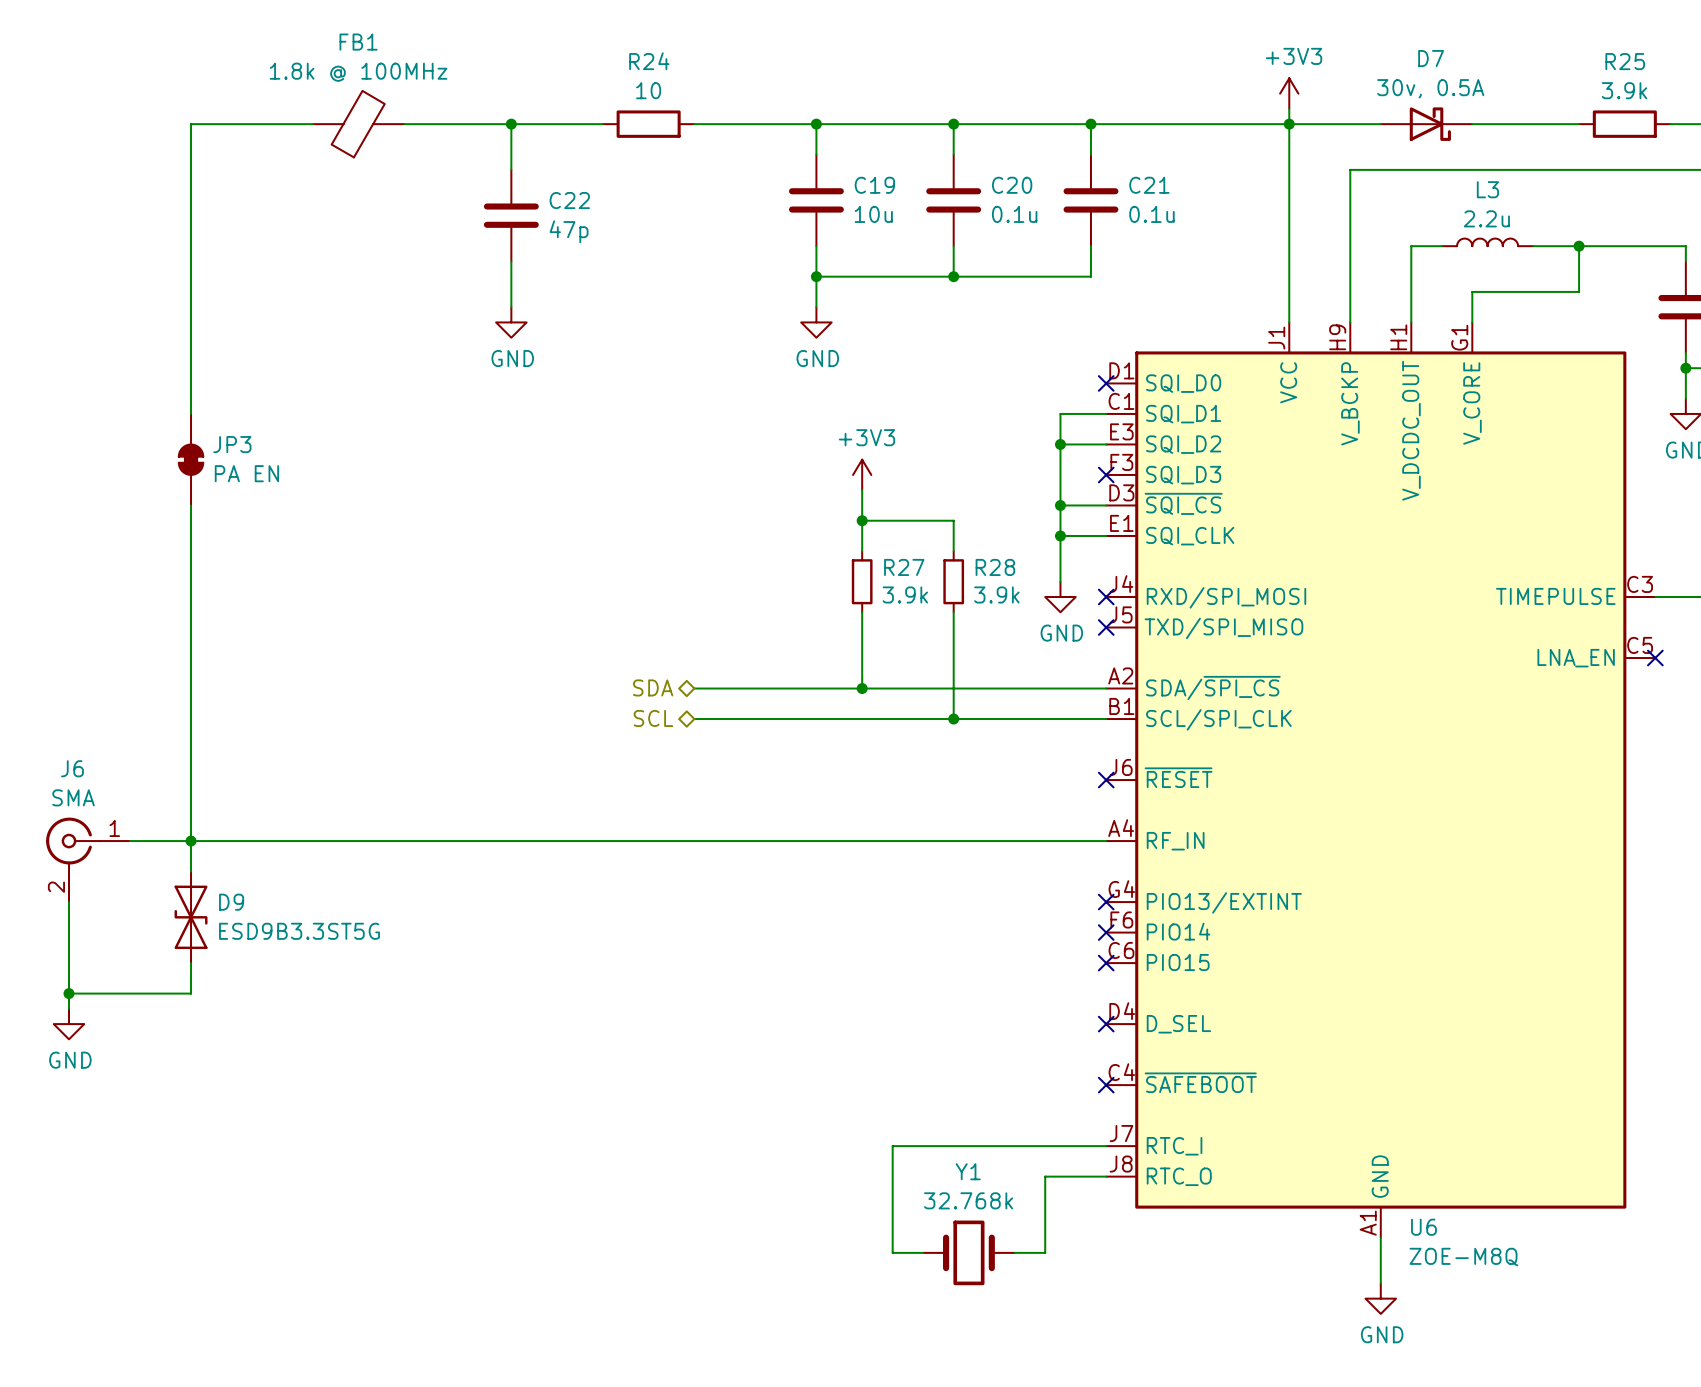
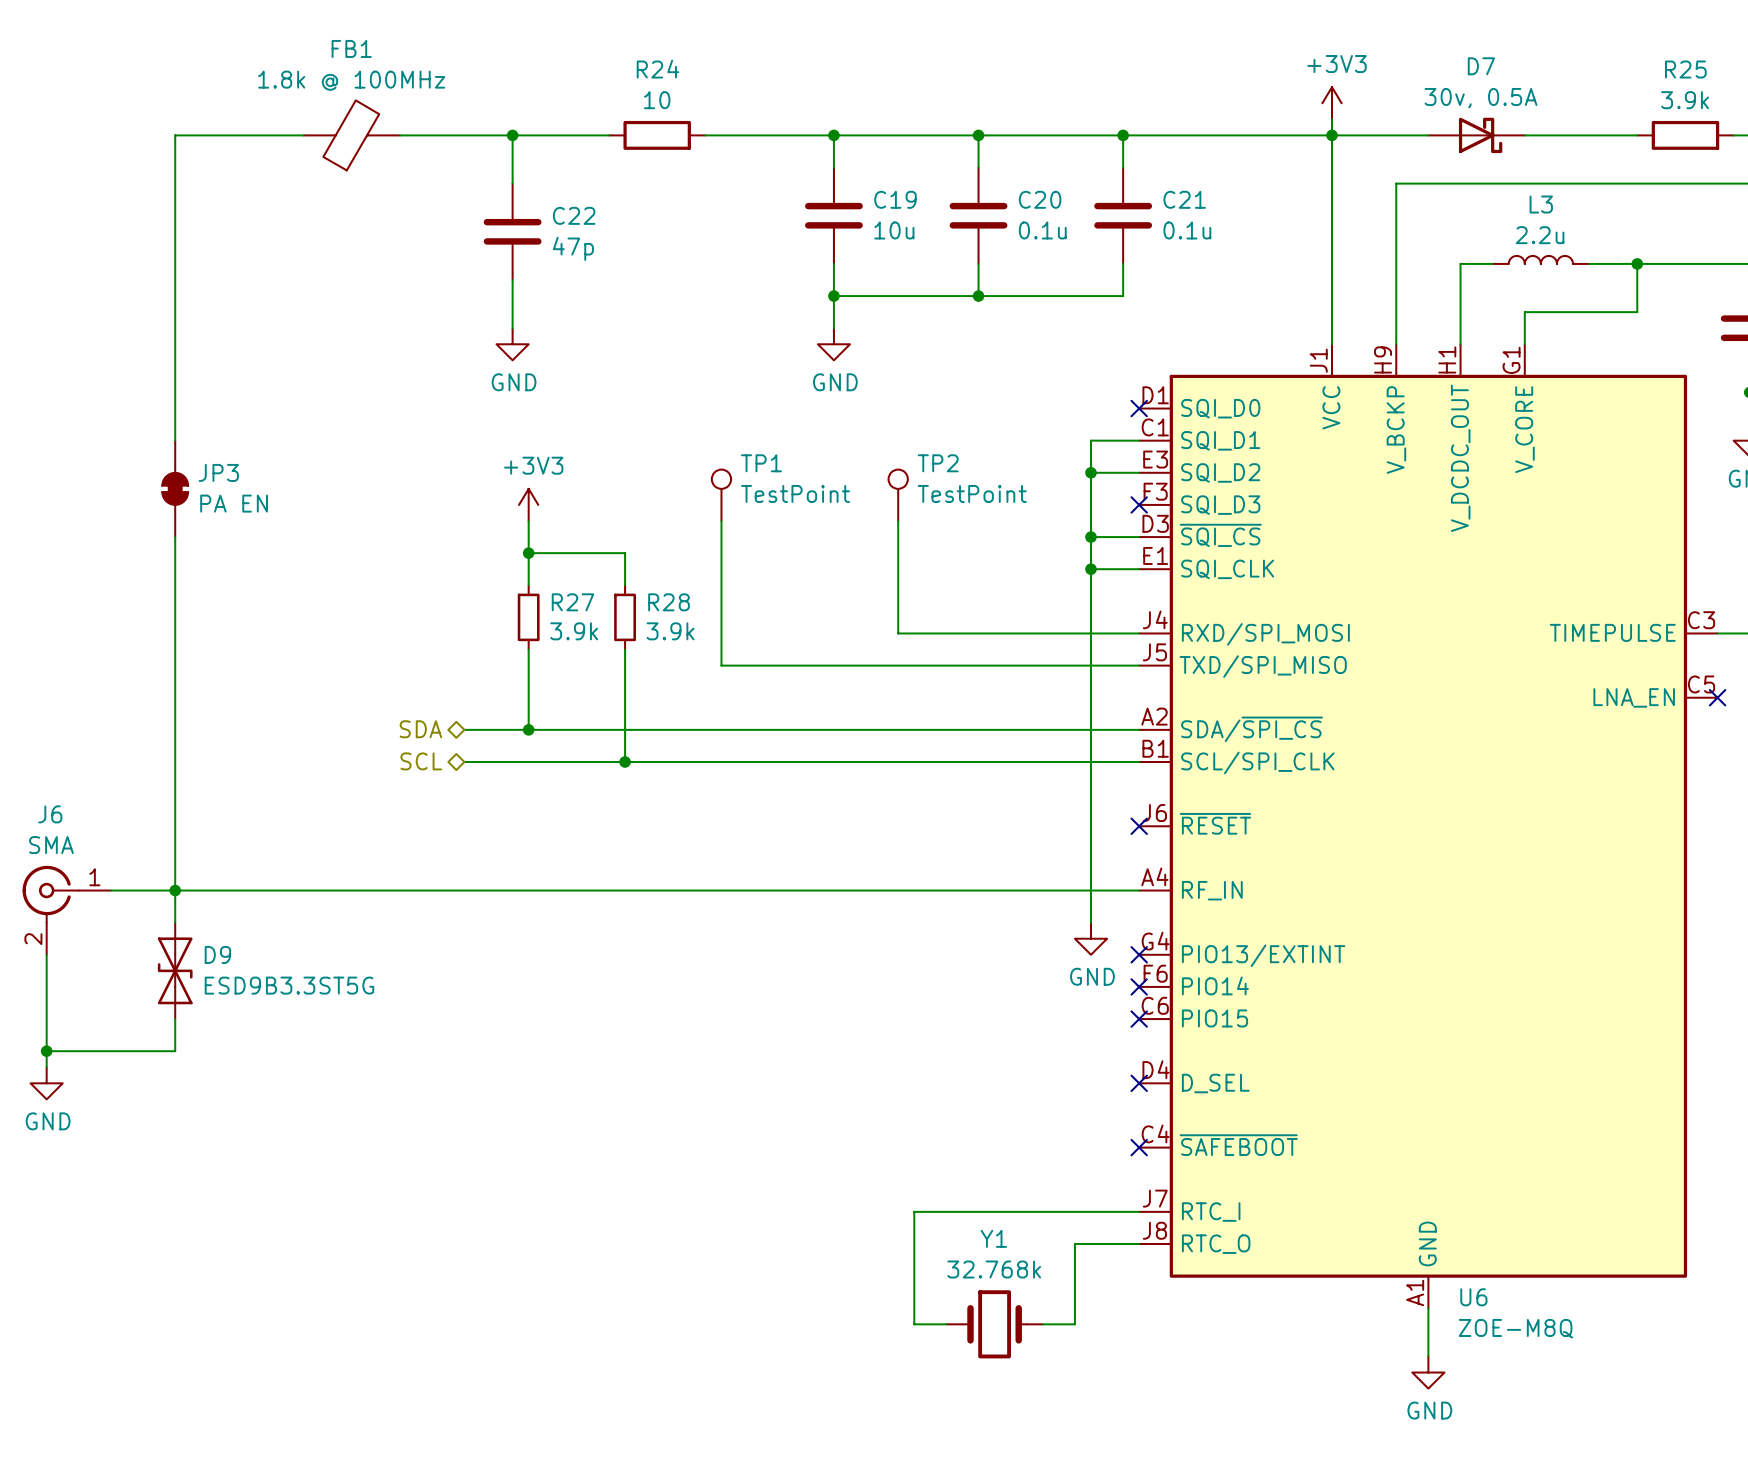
TP1: none -> TestPoint (721, 495)
TP2: none -> TestPoint (898, 495)
power symbol: none -> +3V3 (528, 504)
power symbol: +3V3 (862, 474) -> none
wire: none -> (528, 521) (528, 585)
wire: none -> (721, 521) (721, 665) (1139, 665)
wire: (862, 490) (862, 551) -> none
wire: none -> (898, 521) (898, 633) (1139, 633)
wire: none -> (528, 553) (625, 553) (625, 585)
junction: none -> (528, 553)
wire: (862, 520) (953, 520) (953, 551) -> none
junction: (862, 520) -> none
R27 position: (862, 581) -> (528, 617)
R28 position: (953, 581) -> (625, 617)
wire: none -> (1091, 617) (1091, 922)
power symbol position: GND (1060, 596) -> GND (1091, 938)
no-connect mark: (1106, 596) -> none
wire: none -> (528, 649) (528, 729)
wire: none -> (625, 649) (625, 762)
wire: (862, 612) (862, 688) -> none
wire: (953, 612) (953, 719) -> none
no-connect mark: (1106, 627) -> none
hierarchical label position: SDA (653, 687) -> SDA (420, 729)
wire: none -> (464, 729) (705, 729)
junction: none -> (528, 729)
junction: (862, 688) -> none
hierarchical label position: SCL (653, 718) -> SCL (421, 761)
wire: none -> (464, 762) (705, 762)
junction: none -> (625, 762)
junction: (953, 719) -> none

